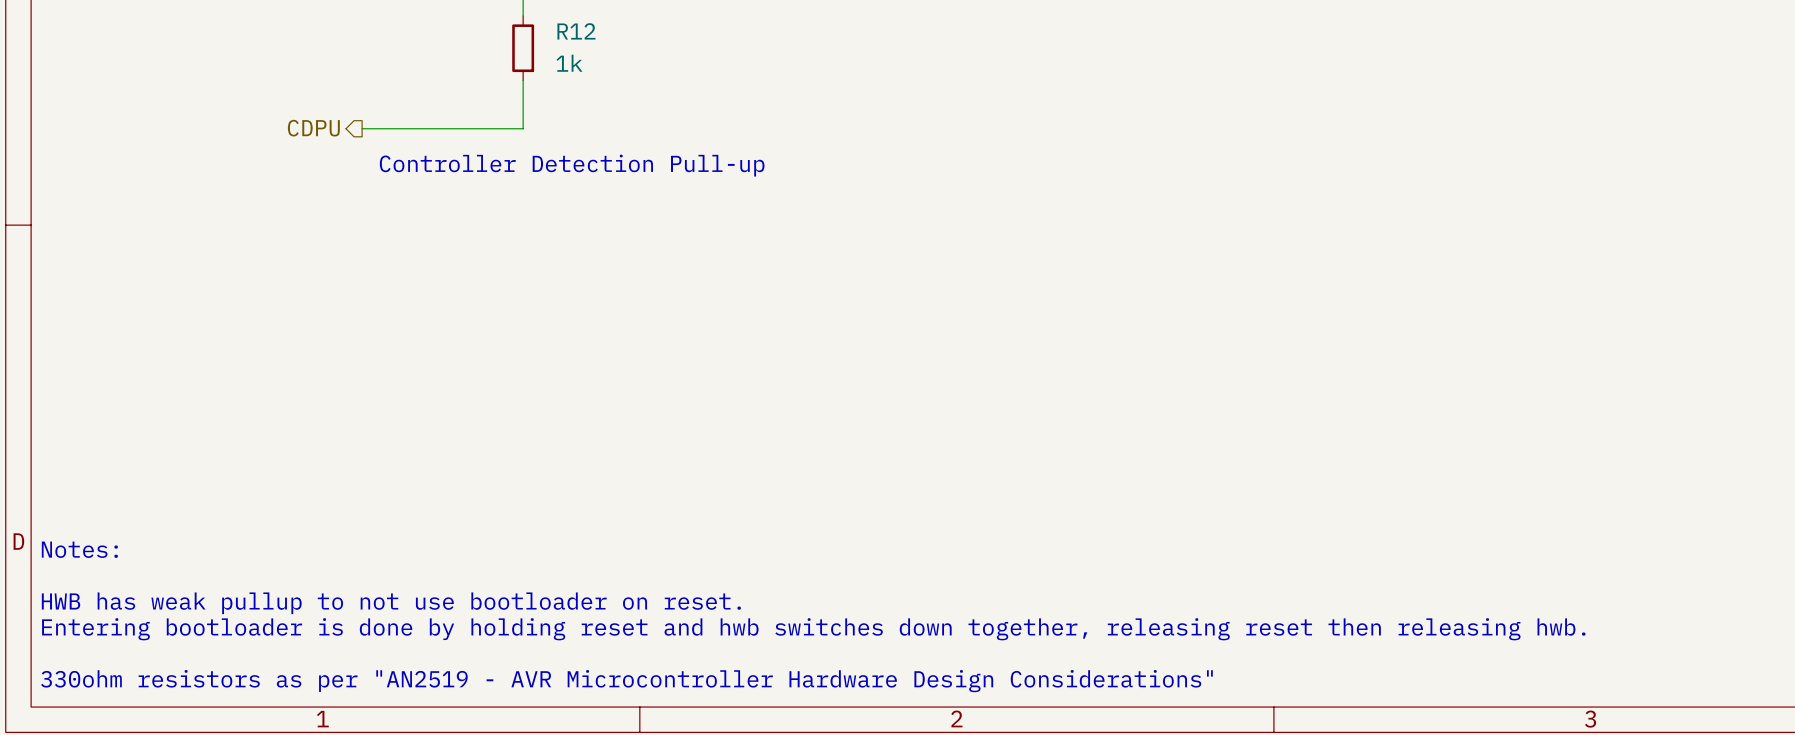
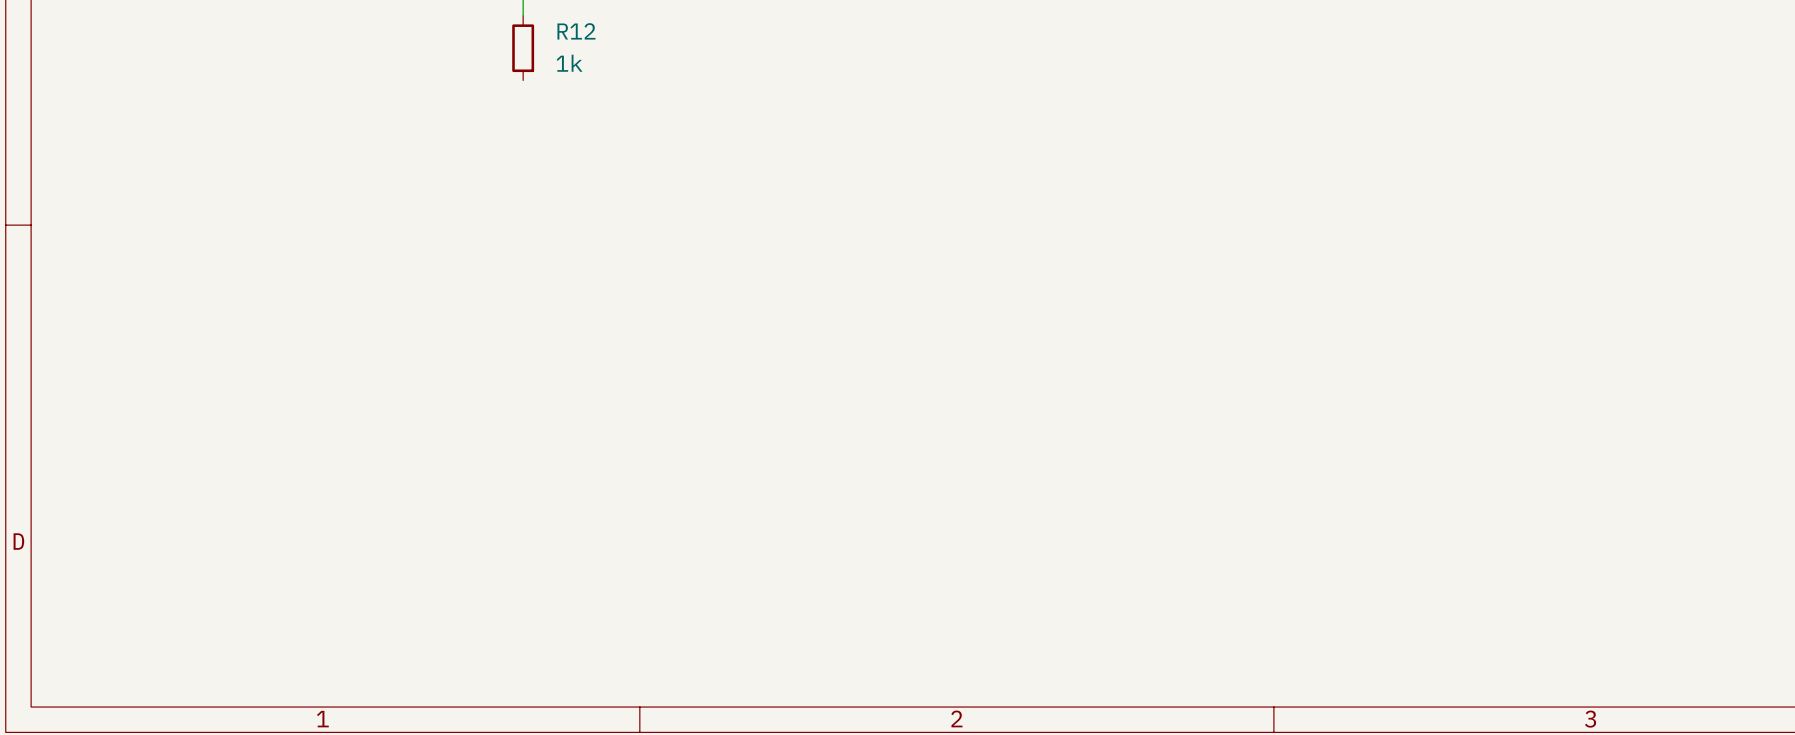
wire: (523, 80) (523, 128) (362, 128) -> none
hierarchical label: CDPU (313, 128) -> none
text: Controller Detection Pull-up (572, 165) -> none
text: Notes: (79, 549) -> none
text: HWB has weak pullup to not use bootloader on reset. (391, 603) -> none
text: Entering bootloader is done by holding reset and hwb switches down together, releasing reset then releasing hwb. (813, 629) -> none
text: 330ohm resistors as per "AN2519 - AVR Microcontroller Hardware Design Considerations" (626, 681) -> none

